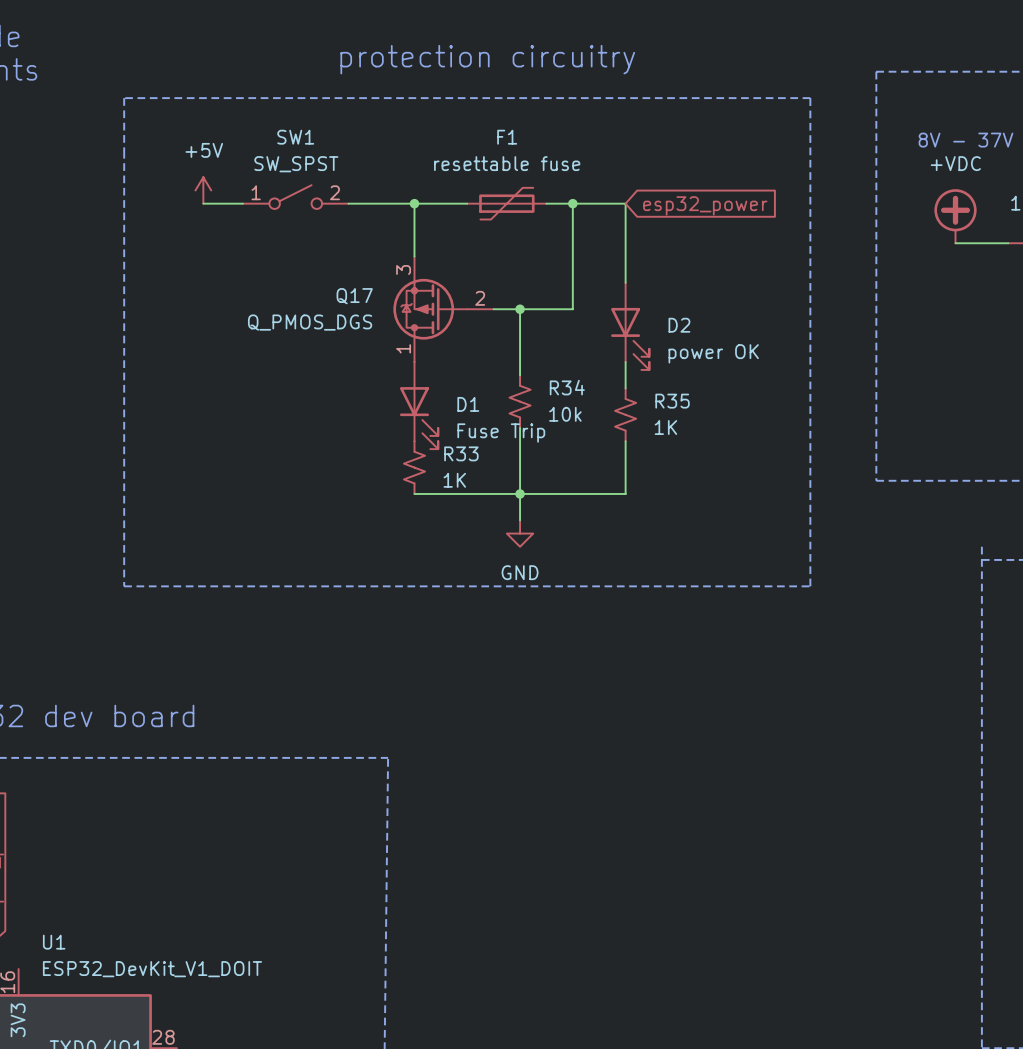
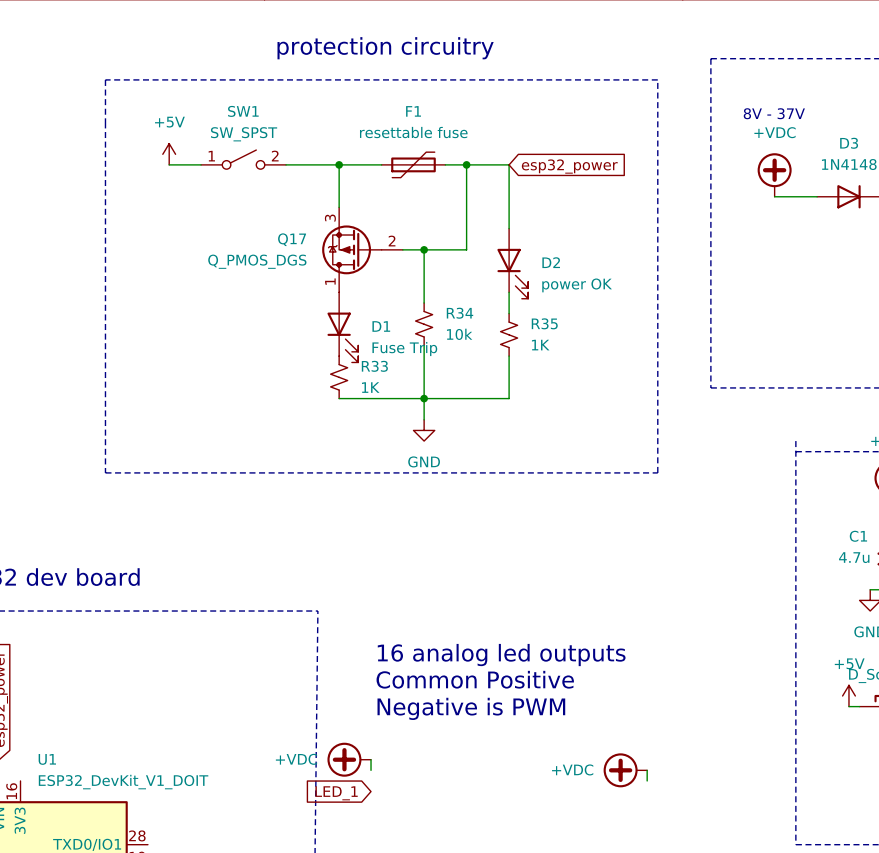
text: none -> 16 analog led outputs (501, 655)
text: none -> Common Positive (475, 679)
text: none -> Negative is PWM (471, 708)
power symbol: none -> +VDC (349, 759)
wire: none -> (371, 759) (371, 770)
power symbol: none -> +VDC (625, 770)
wire: none -> (647, 770) (647, 780)
global label: none -> LED_1 (336, 793)

